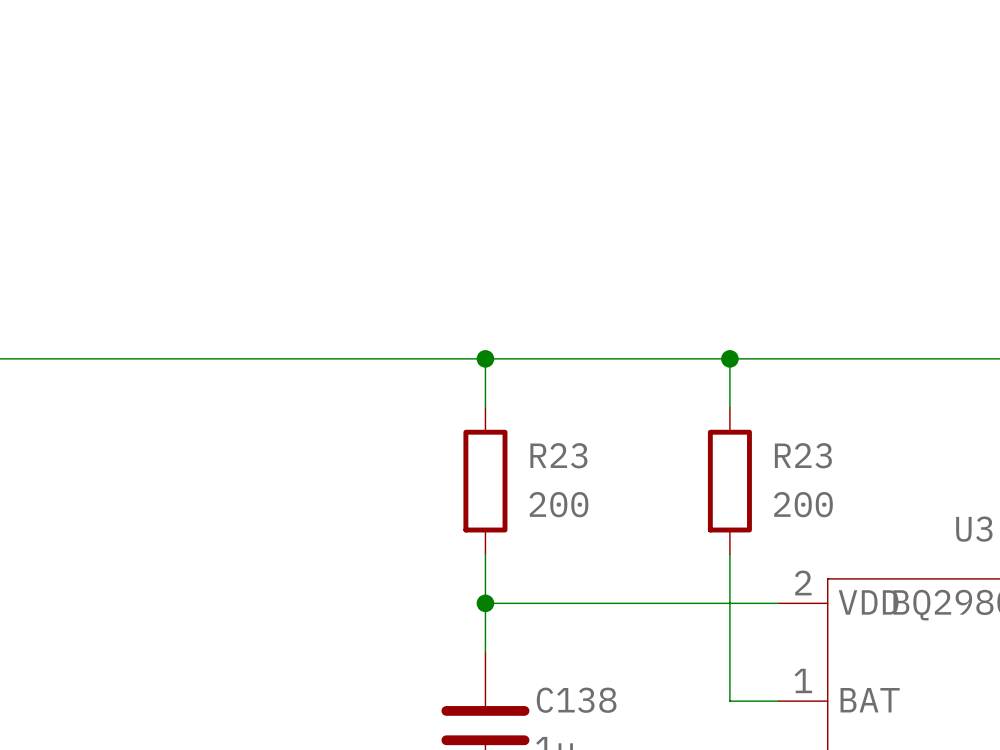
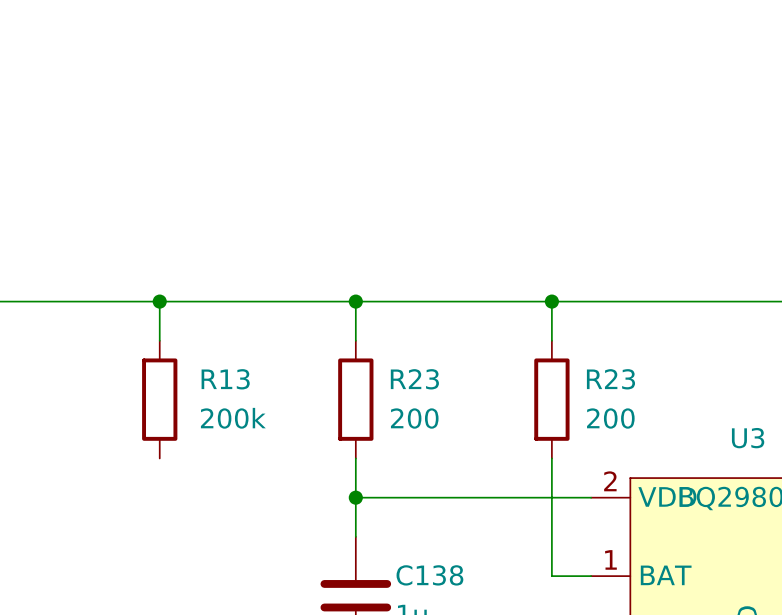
wire: none -> (159, 301) (159, 340)
junction: none -> (159, 301)
R13: none -> 200k (159, 399)

